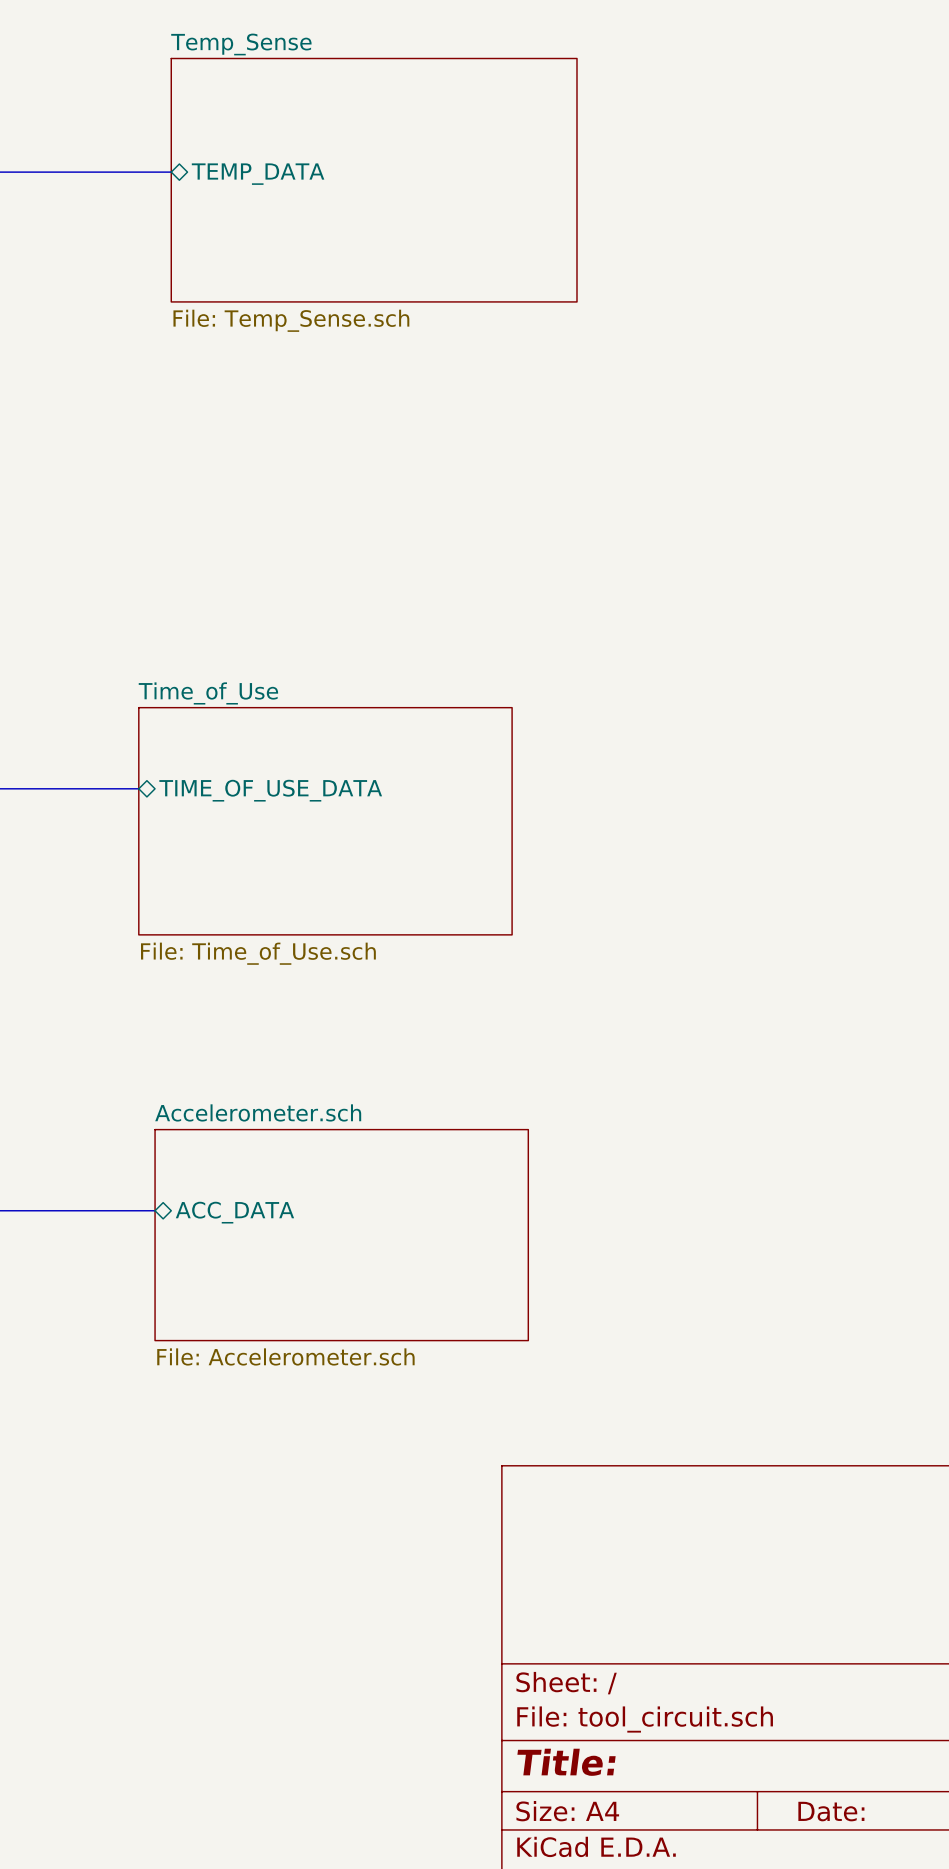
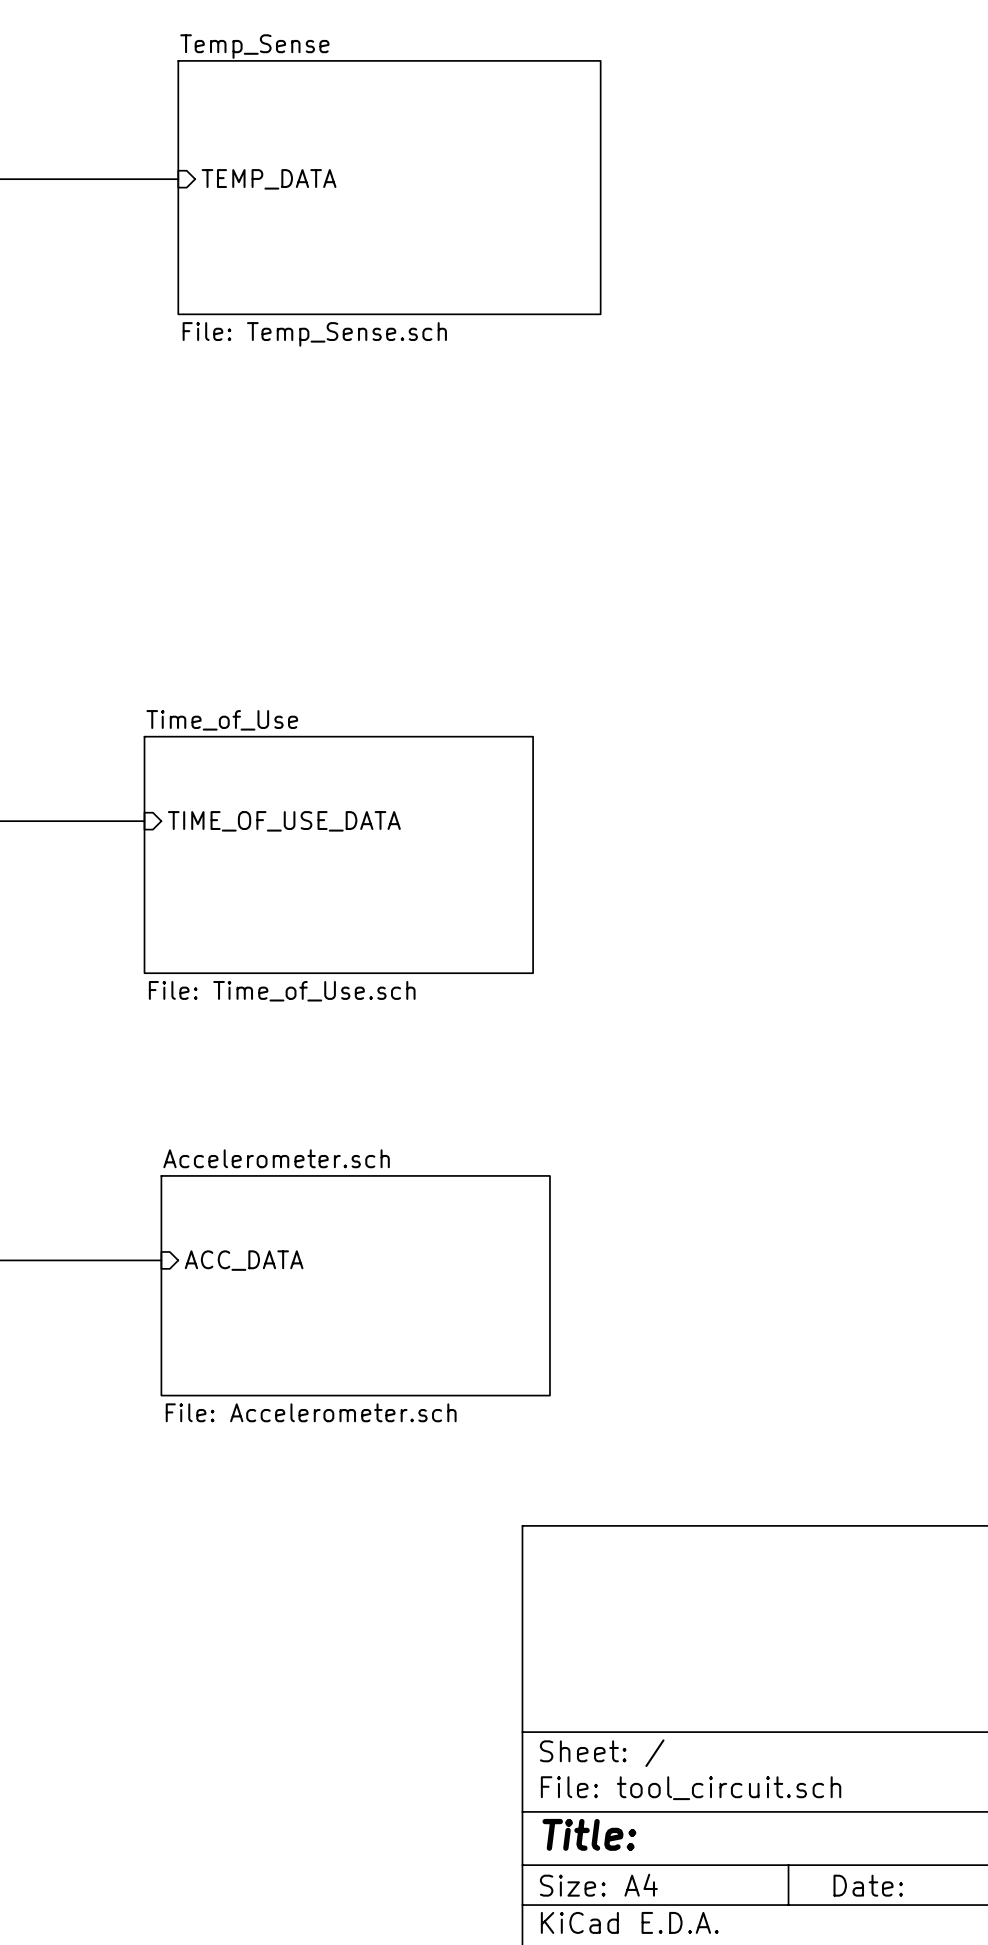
sheet pin shape: bidirectional (258, 174) -> input (269, 179)
sheet pin shape: bidirectional (270, 790) -> input (284, 821)
sheet pin shape: bidirectional (234, 1212) -> input (244, 1260)

